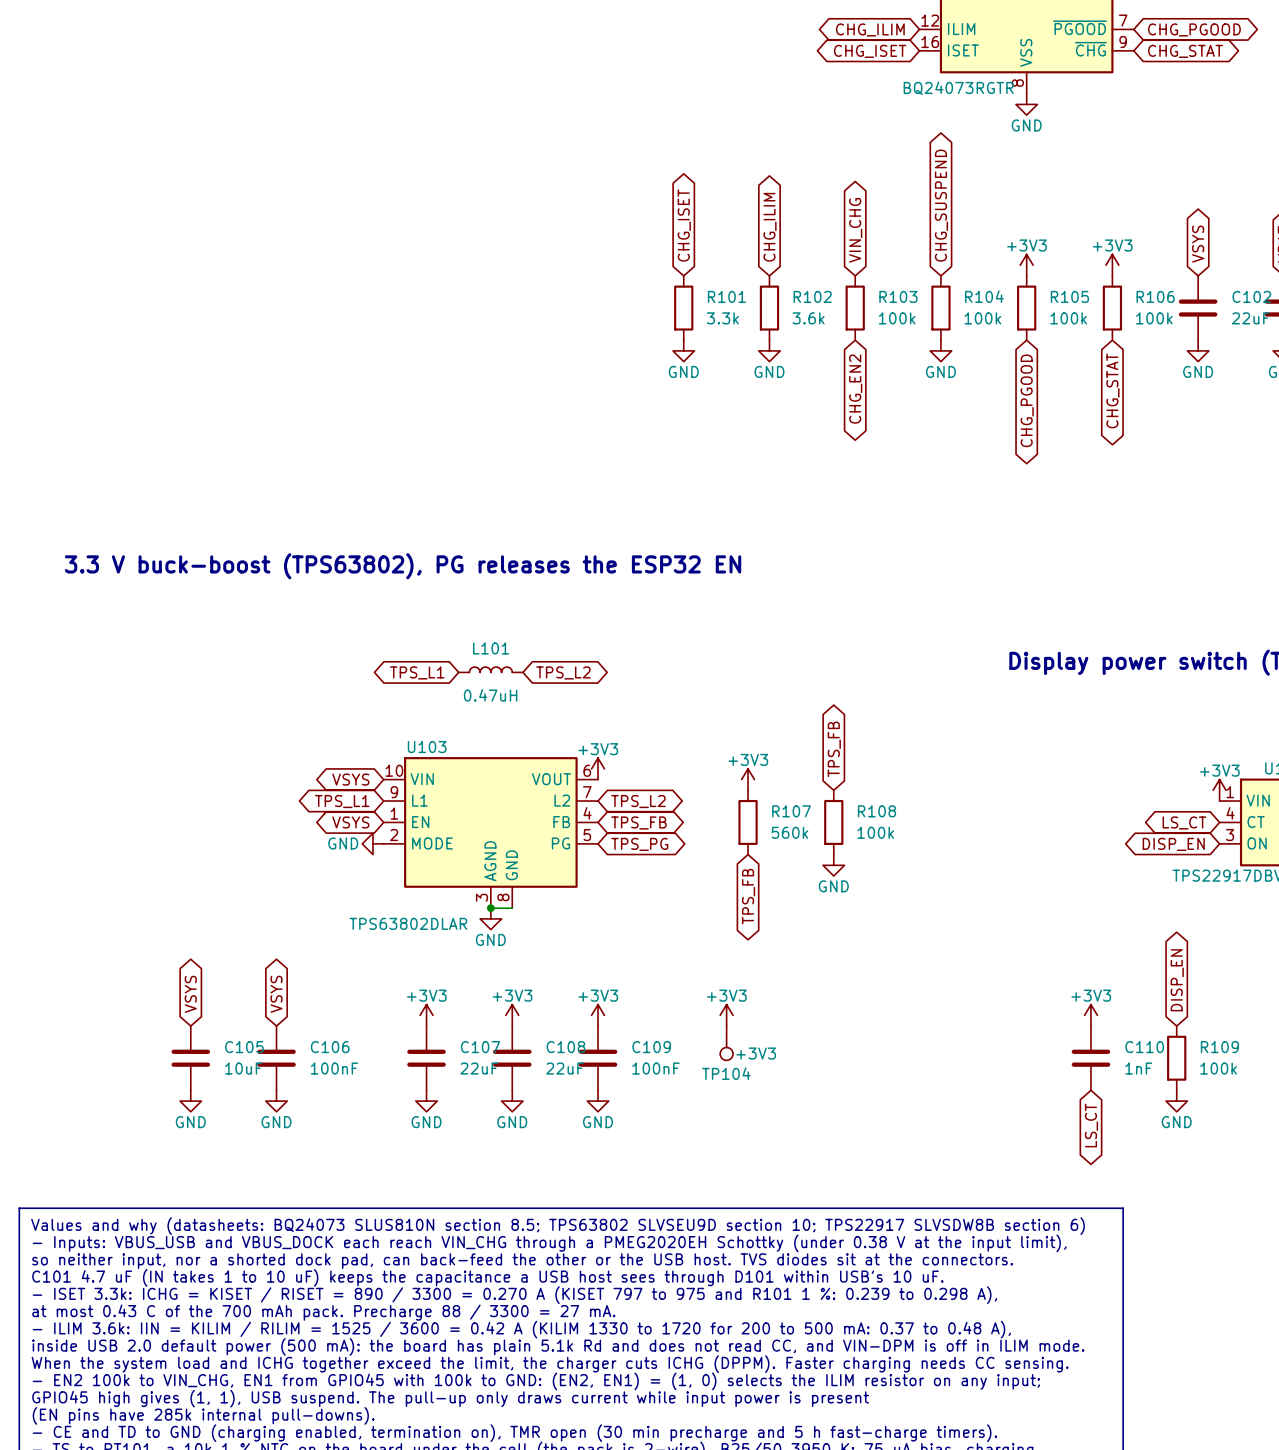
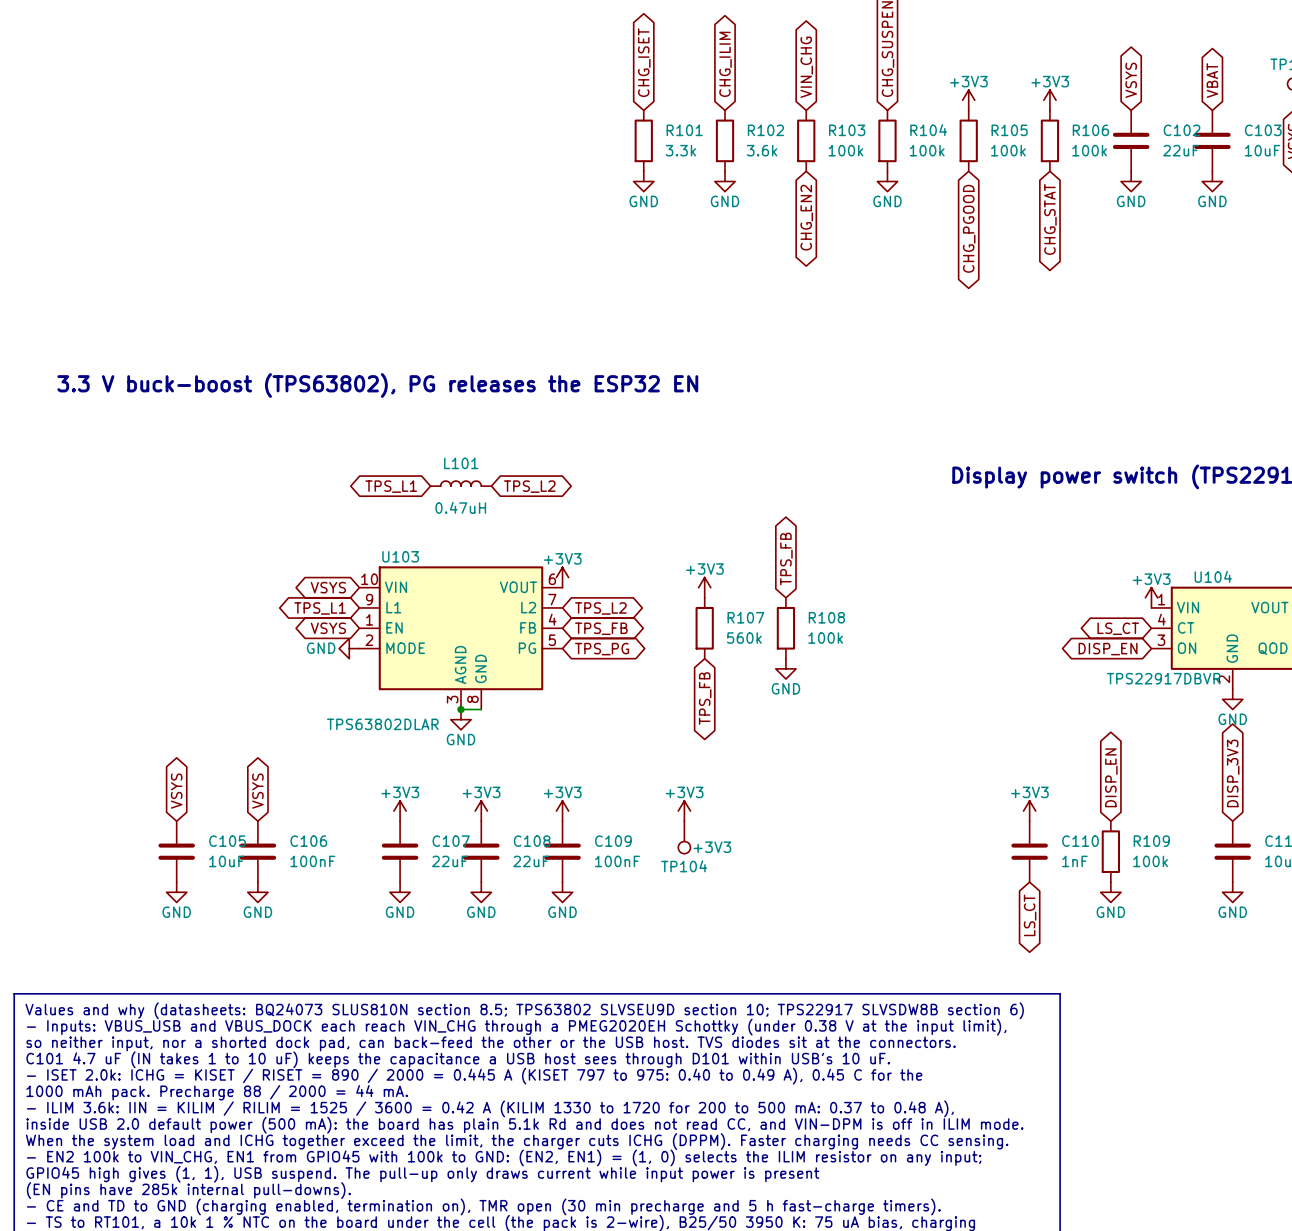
text: - ISET 3.3k: ICHG = KISET / RISET = 890 / 3300 = 0.270 A (KISET 797 to 975 and R101 1 %: 0.239 to 0.298 A), (514, 1295) -> - ISET 2.0k: ICHG = KISET / RISET = 890 / 2000 = 0.445 A (KISET 797 to 975: 0.40 to 0.49 A), 0.45 C for the (474, 1076)
text: at most 0.43 C of the 700 mAh pack. Precharge 88 / 3300 = 27 mA. (323, 1312) -> 1000 mAh pack. Precharge 88 / 2000 = 44 mA. (217, 1092)

